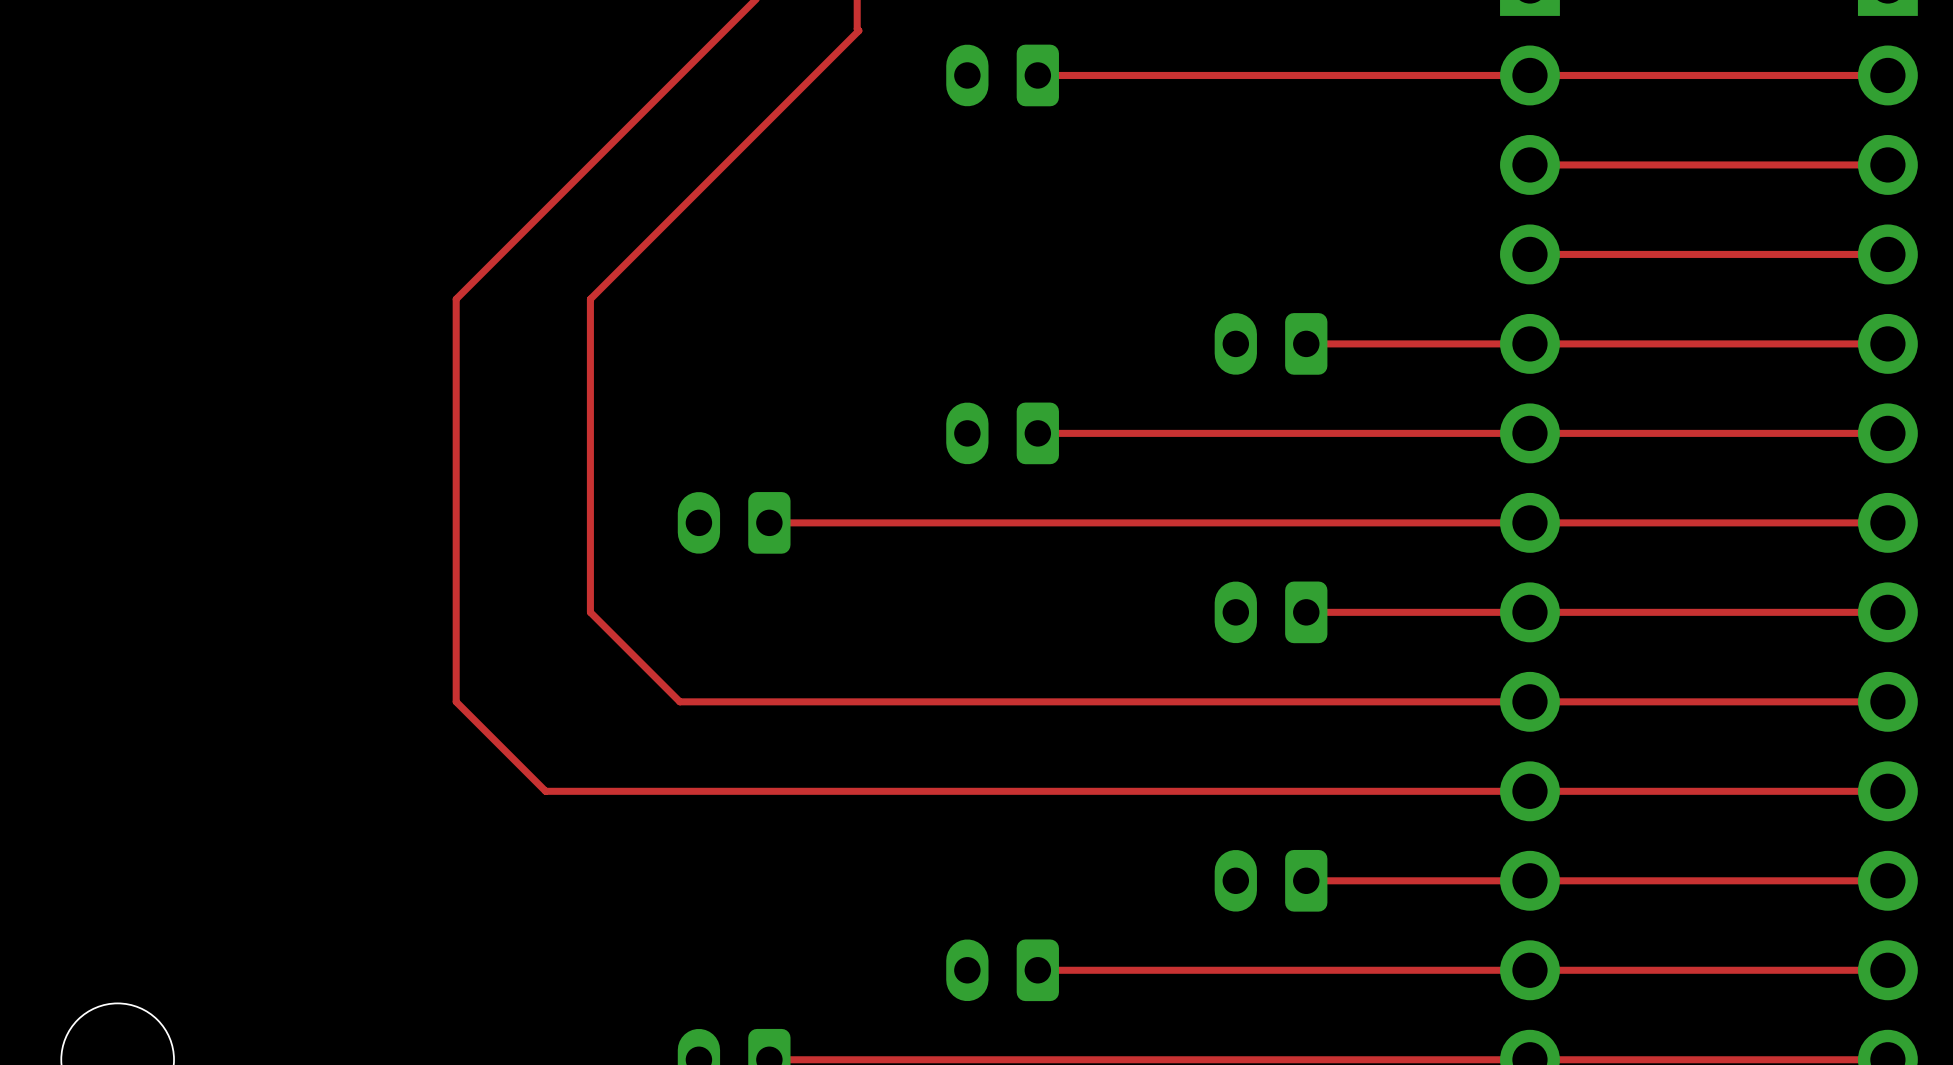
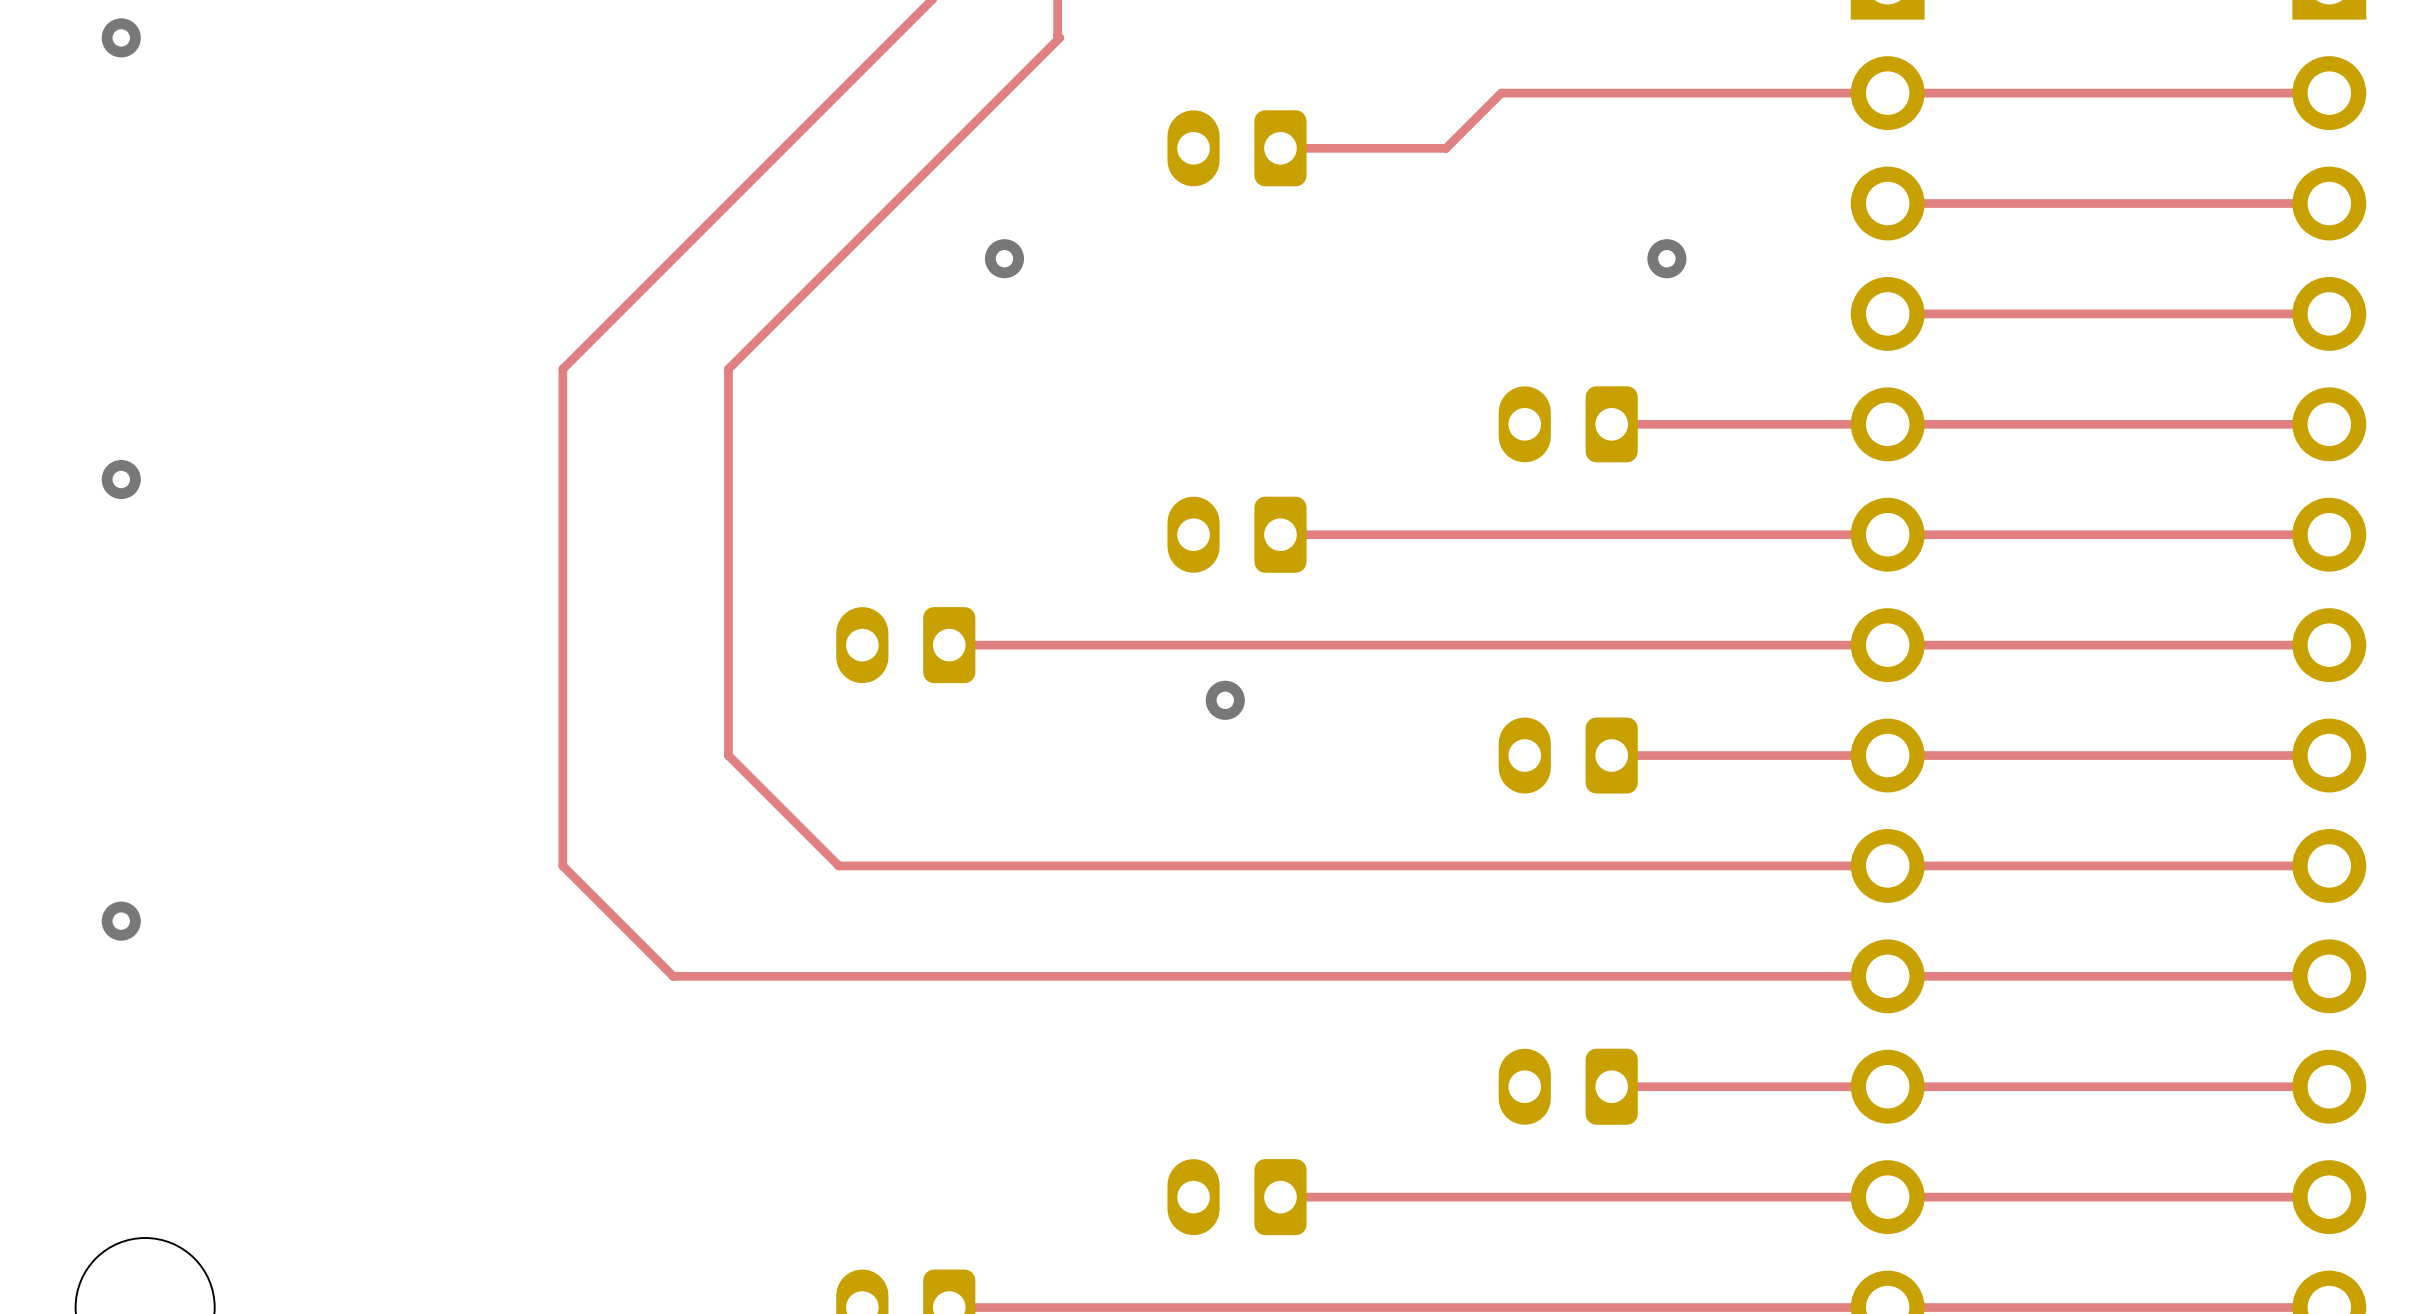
via: none -> (121, 37)
part position: (1002, 75) -> (1237, 148)
top track: (1216, 75) (1037, 75) -> (1501, 93) (1446, 148) (1280, 148)
via: none -> (1004, 258)
via: none -> (1666, 258)
via: none -> (121, 479)
via: none -> (1225, 700)
via: none -> (121, 921)

